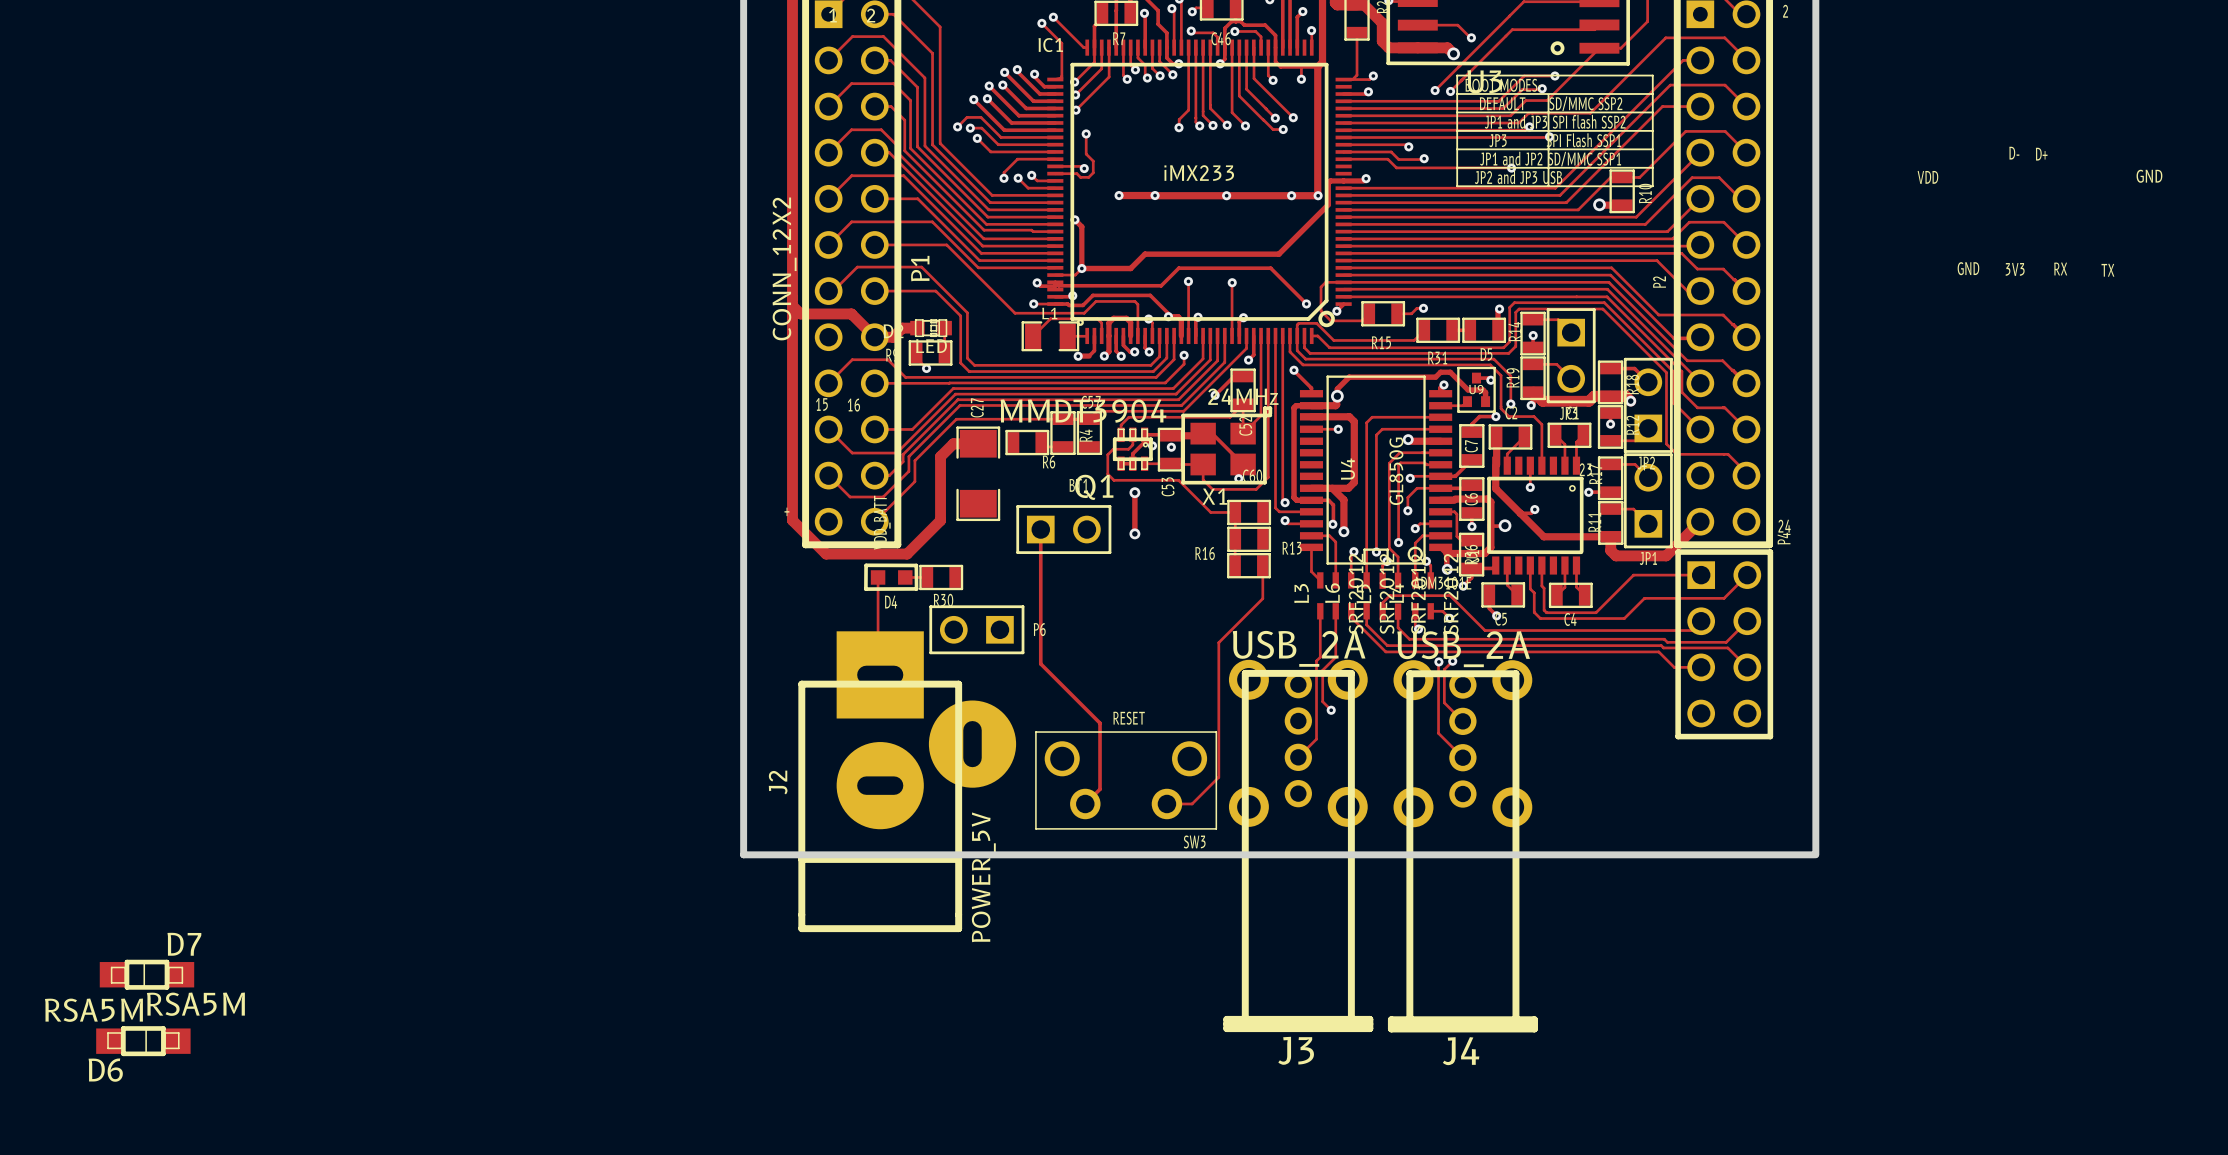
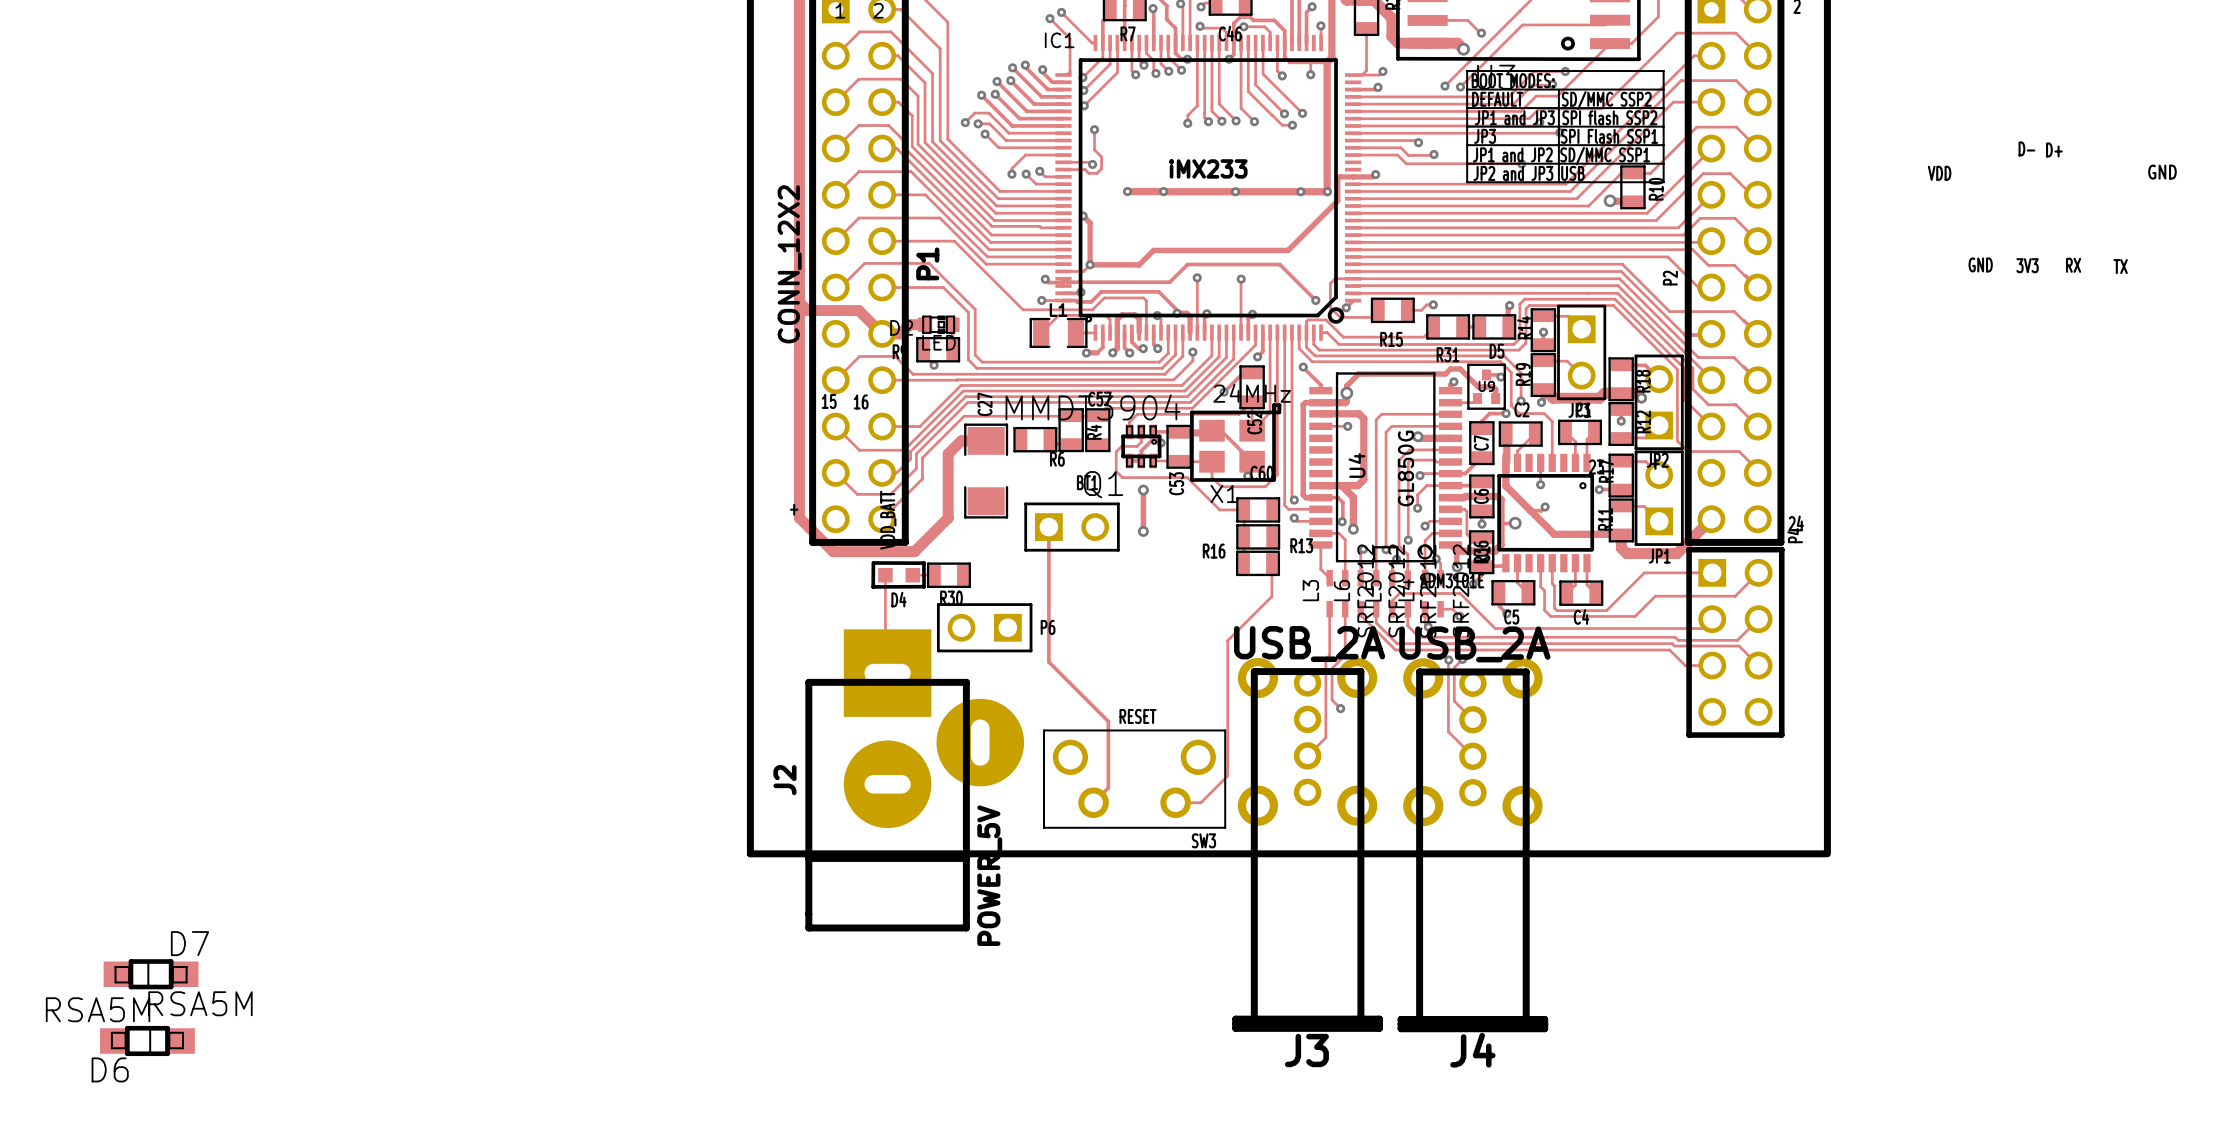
via: (1171, 447) -> none

